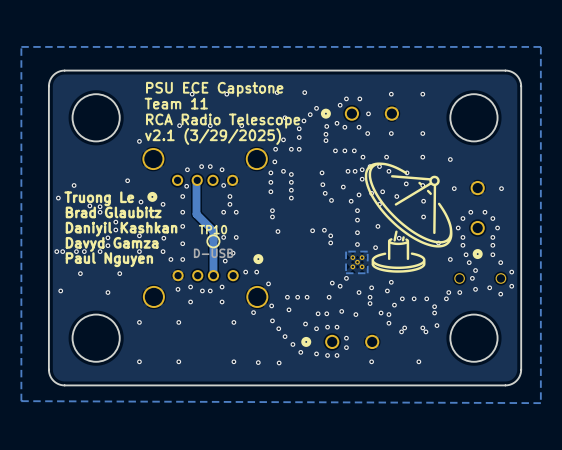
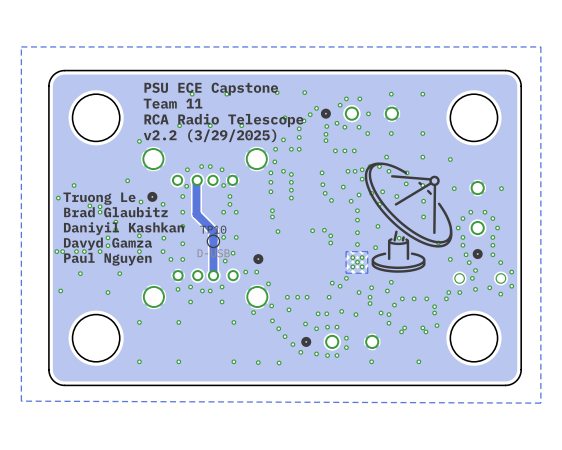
text: v2.1 (3/29/2025) (213, 136) -> v2.2 (3/29/2025) (210, 135)
via: (362, 157) -> none

